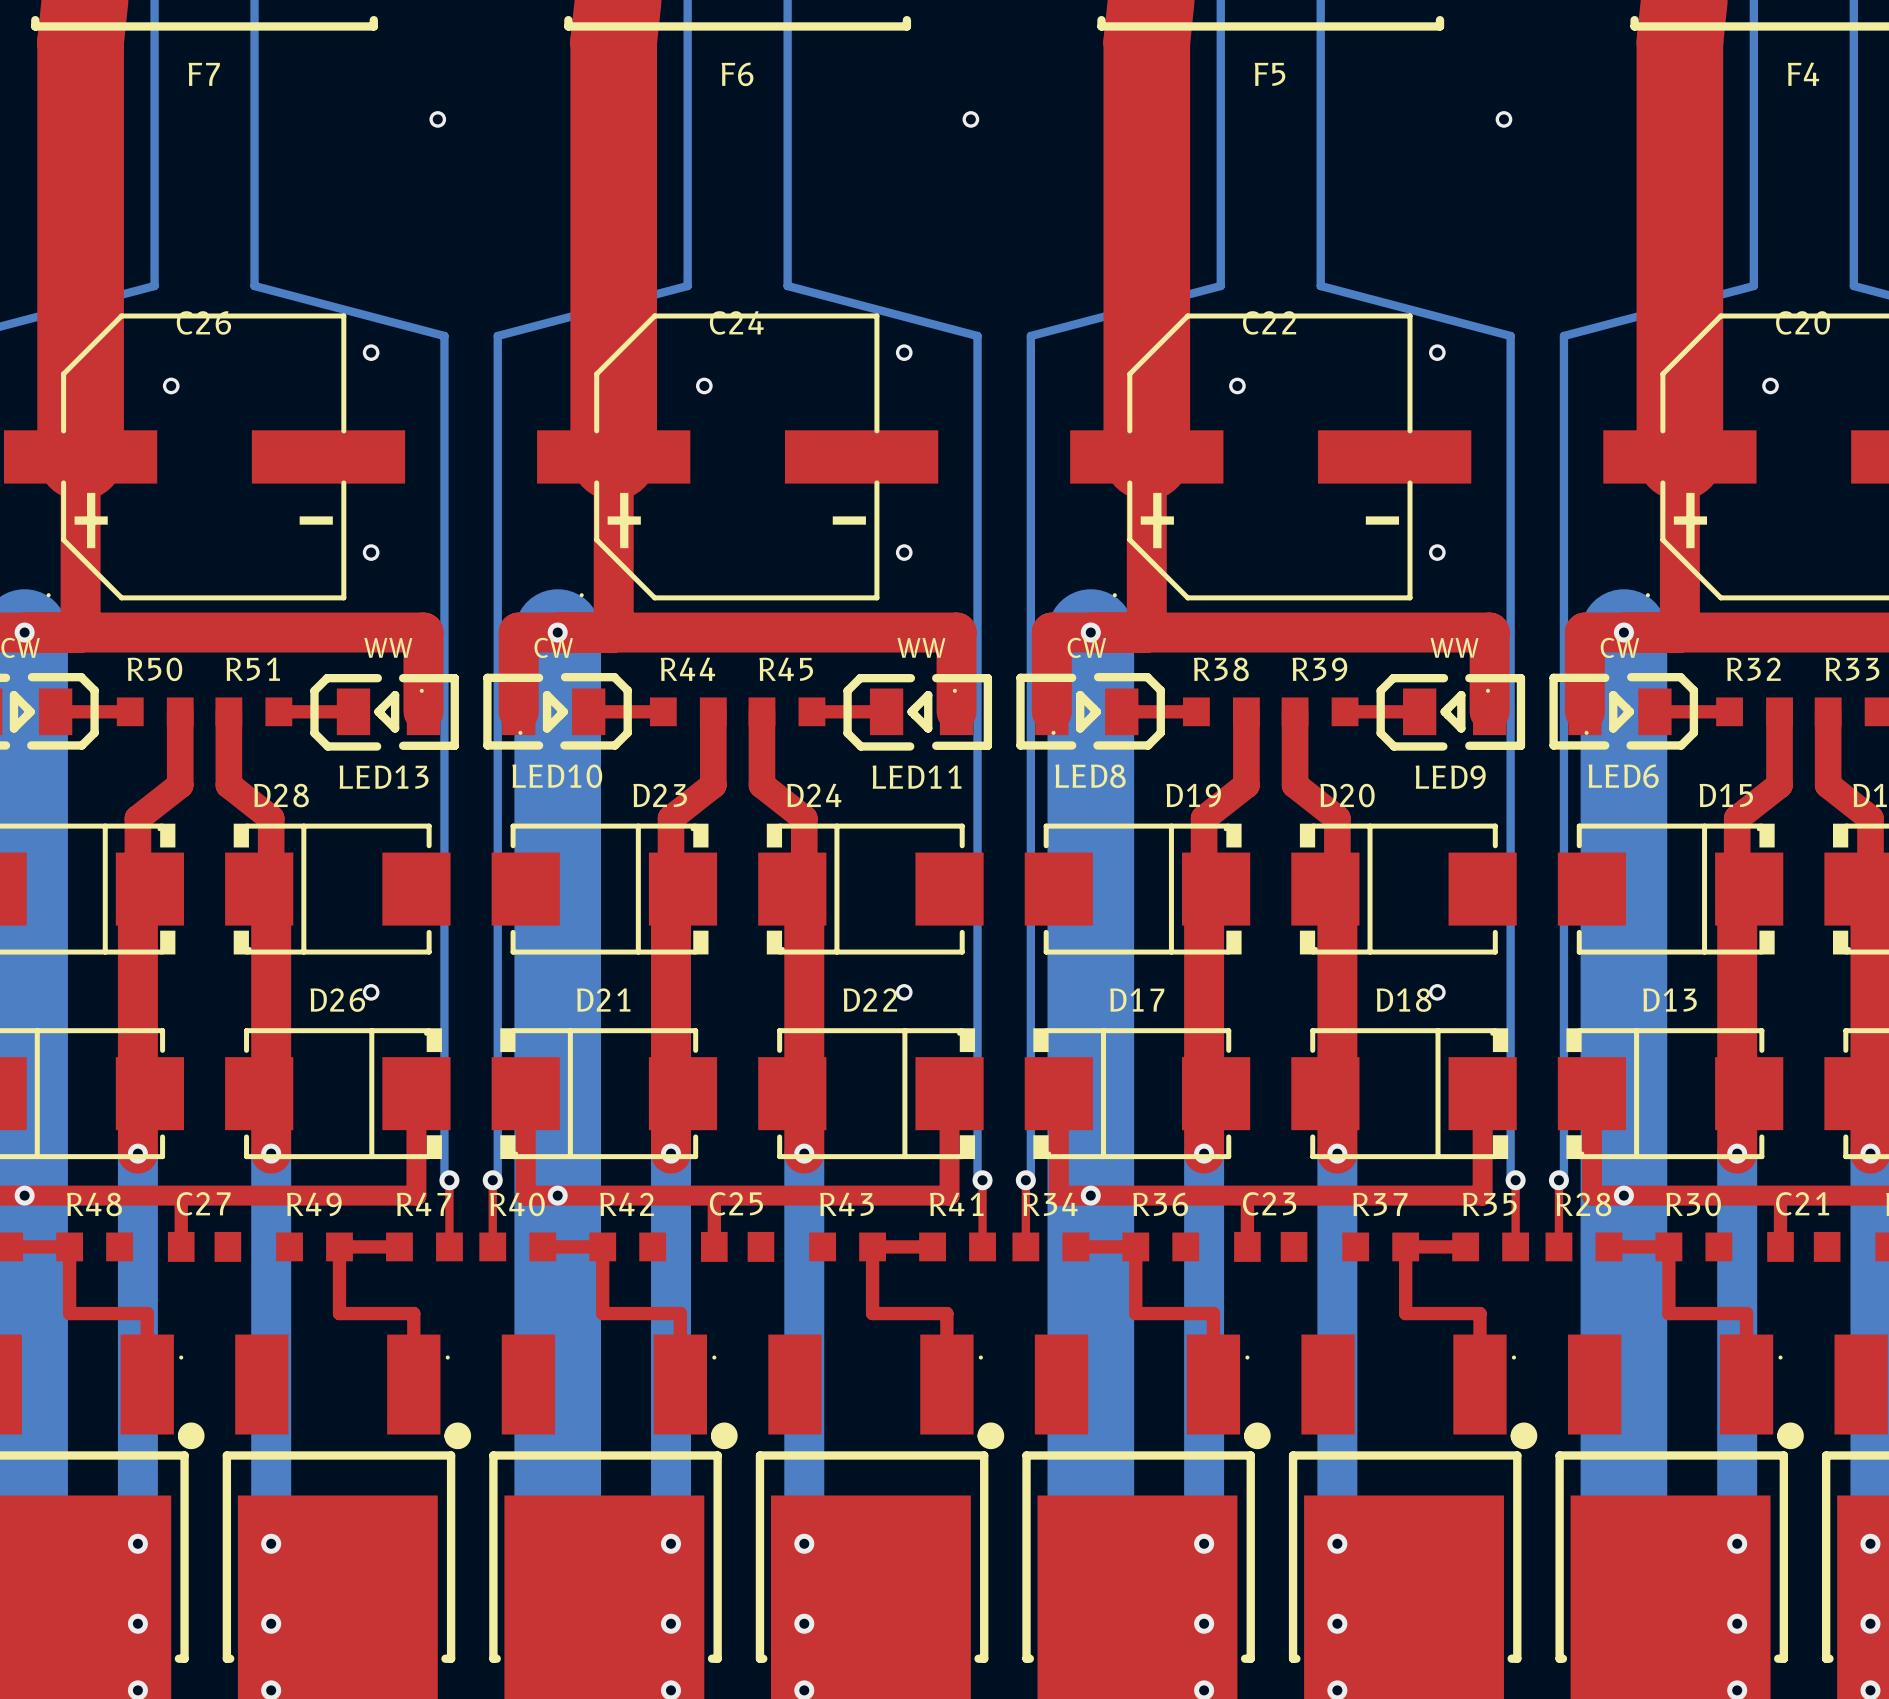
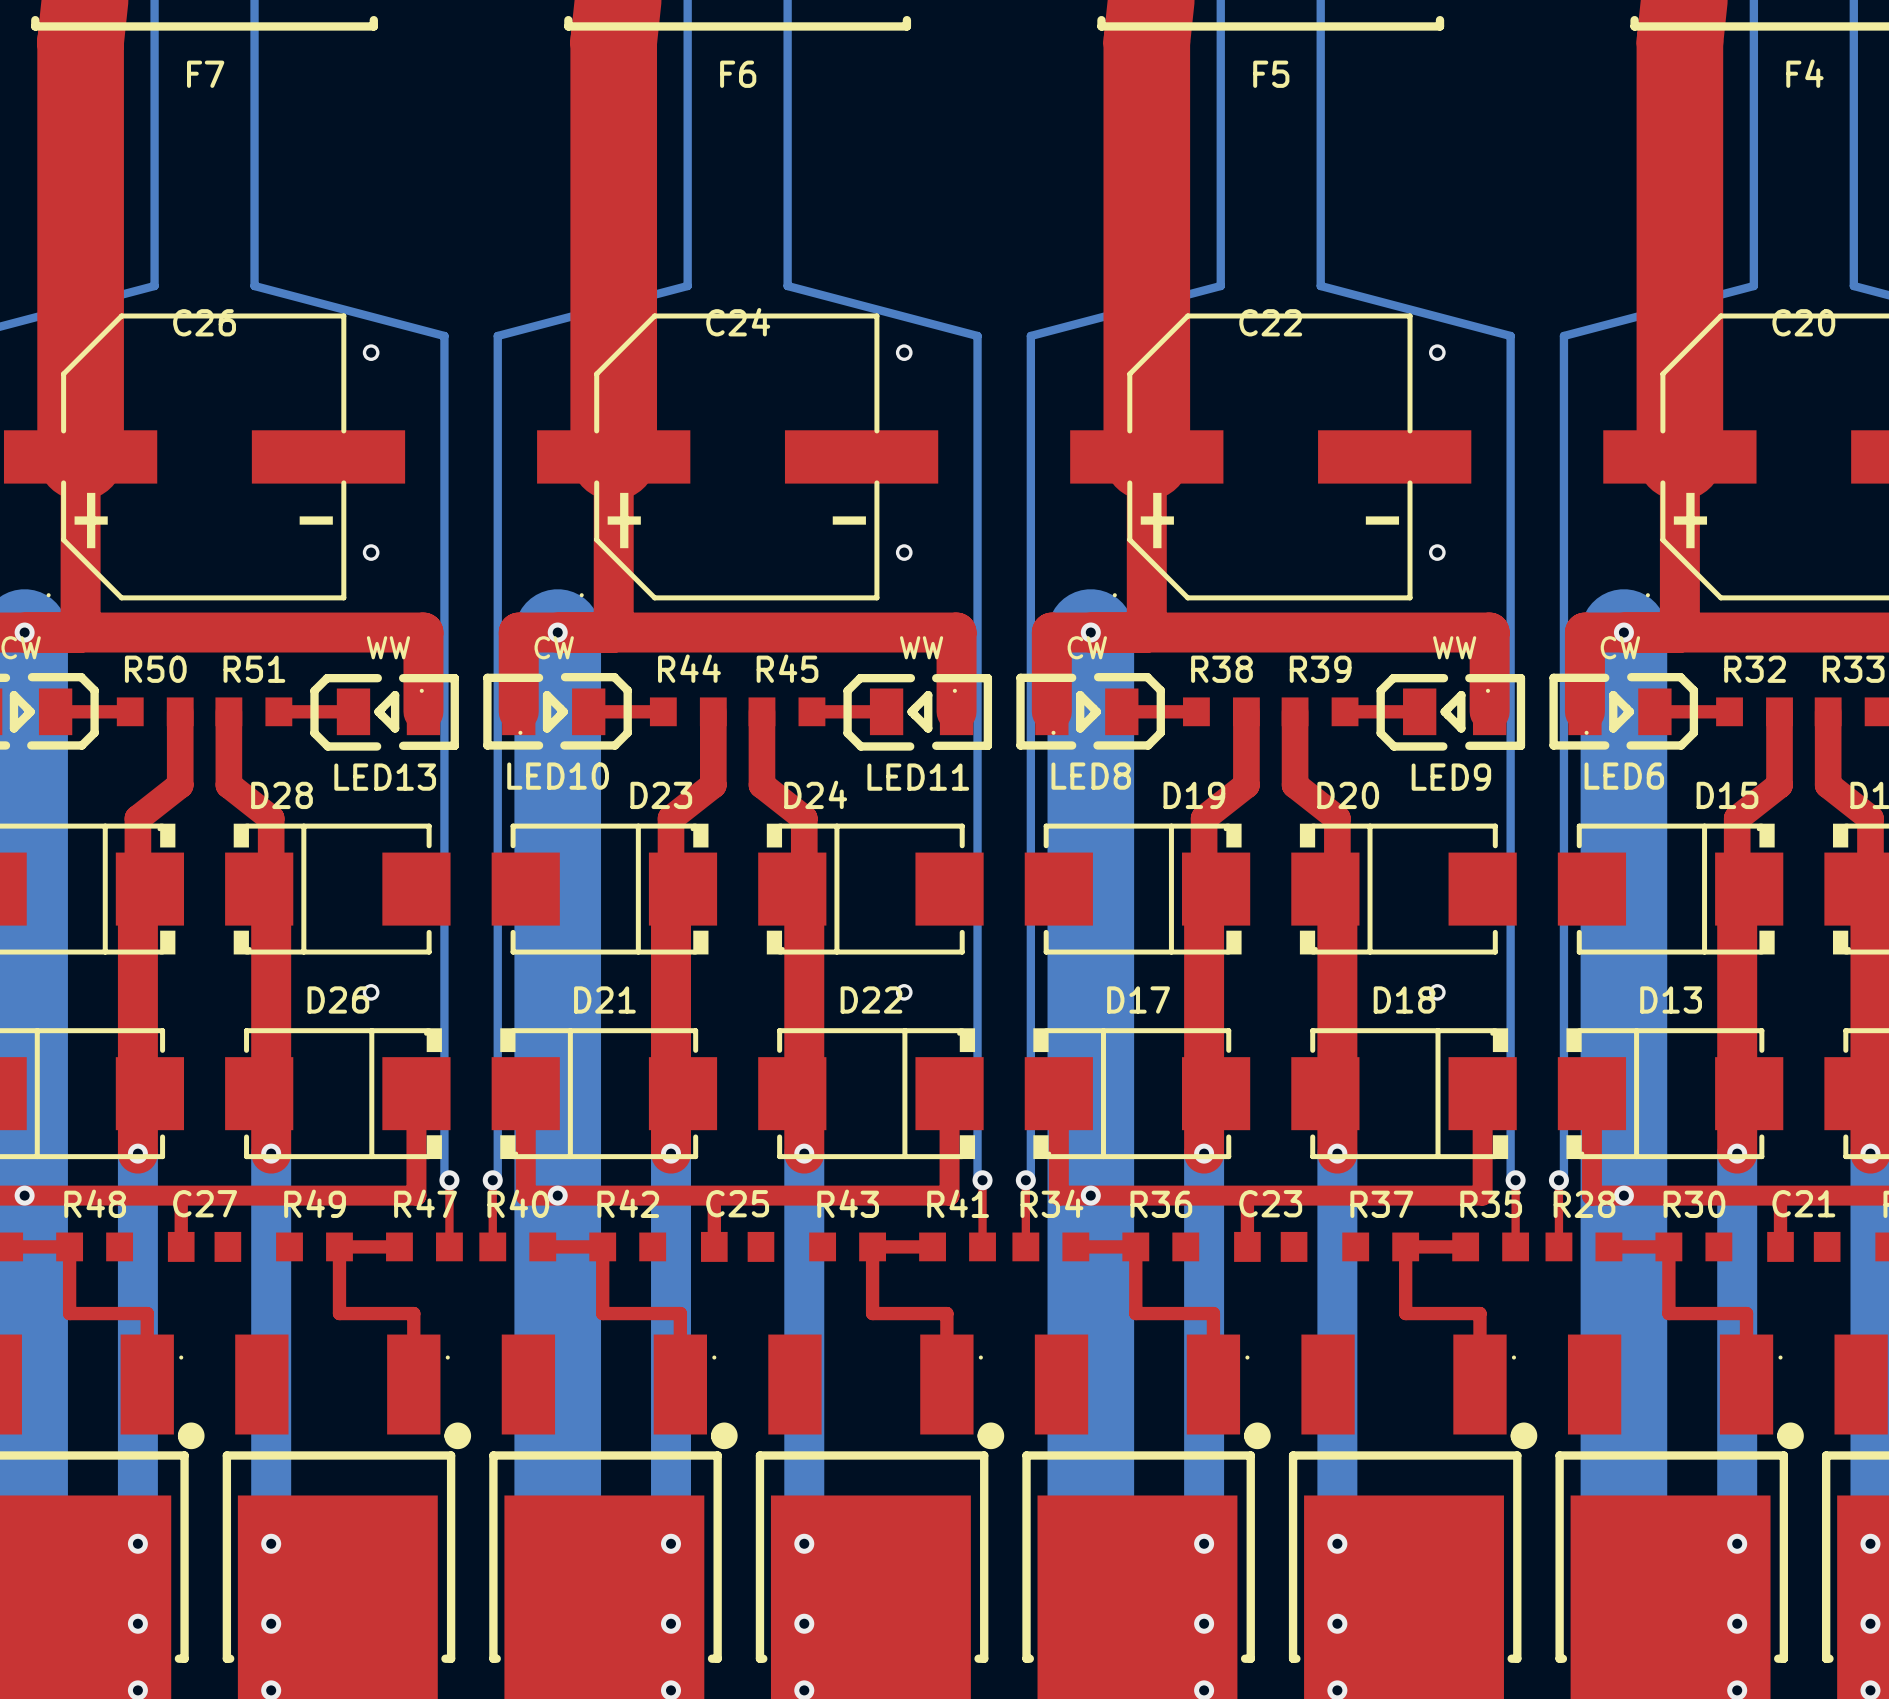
via: (437, 119) -> none
via: (970, 119) -> none
via: (1503, 119) -> none
via: (171, 385) -> none
via: (704, 385) -> none
via: (1237, 385) -> none
via: (1770, 385) -> none

